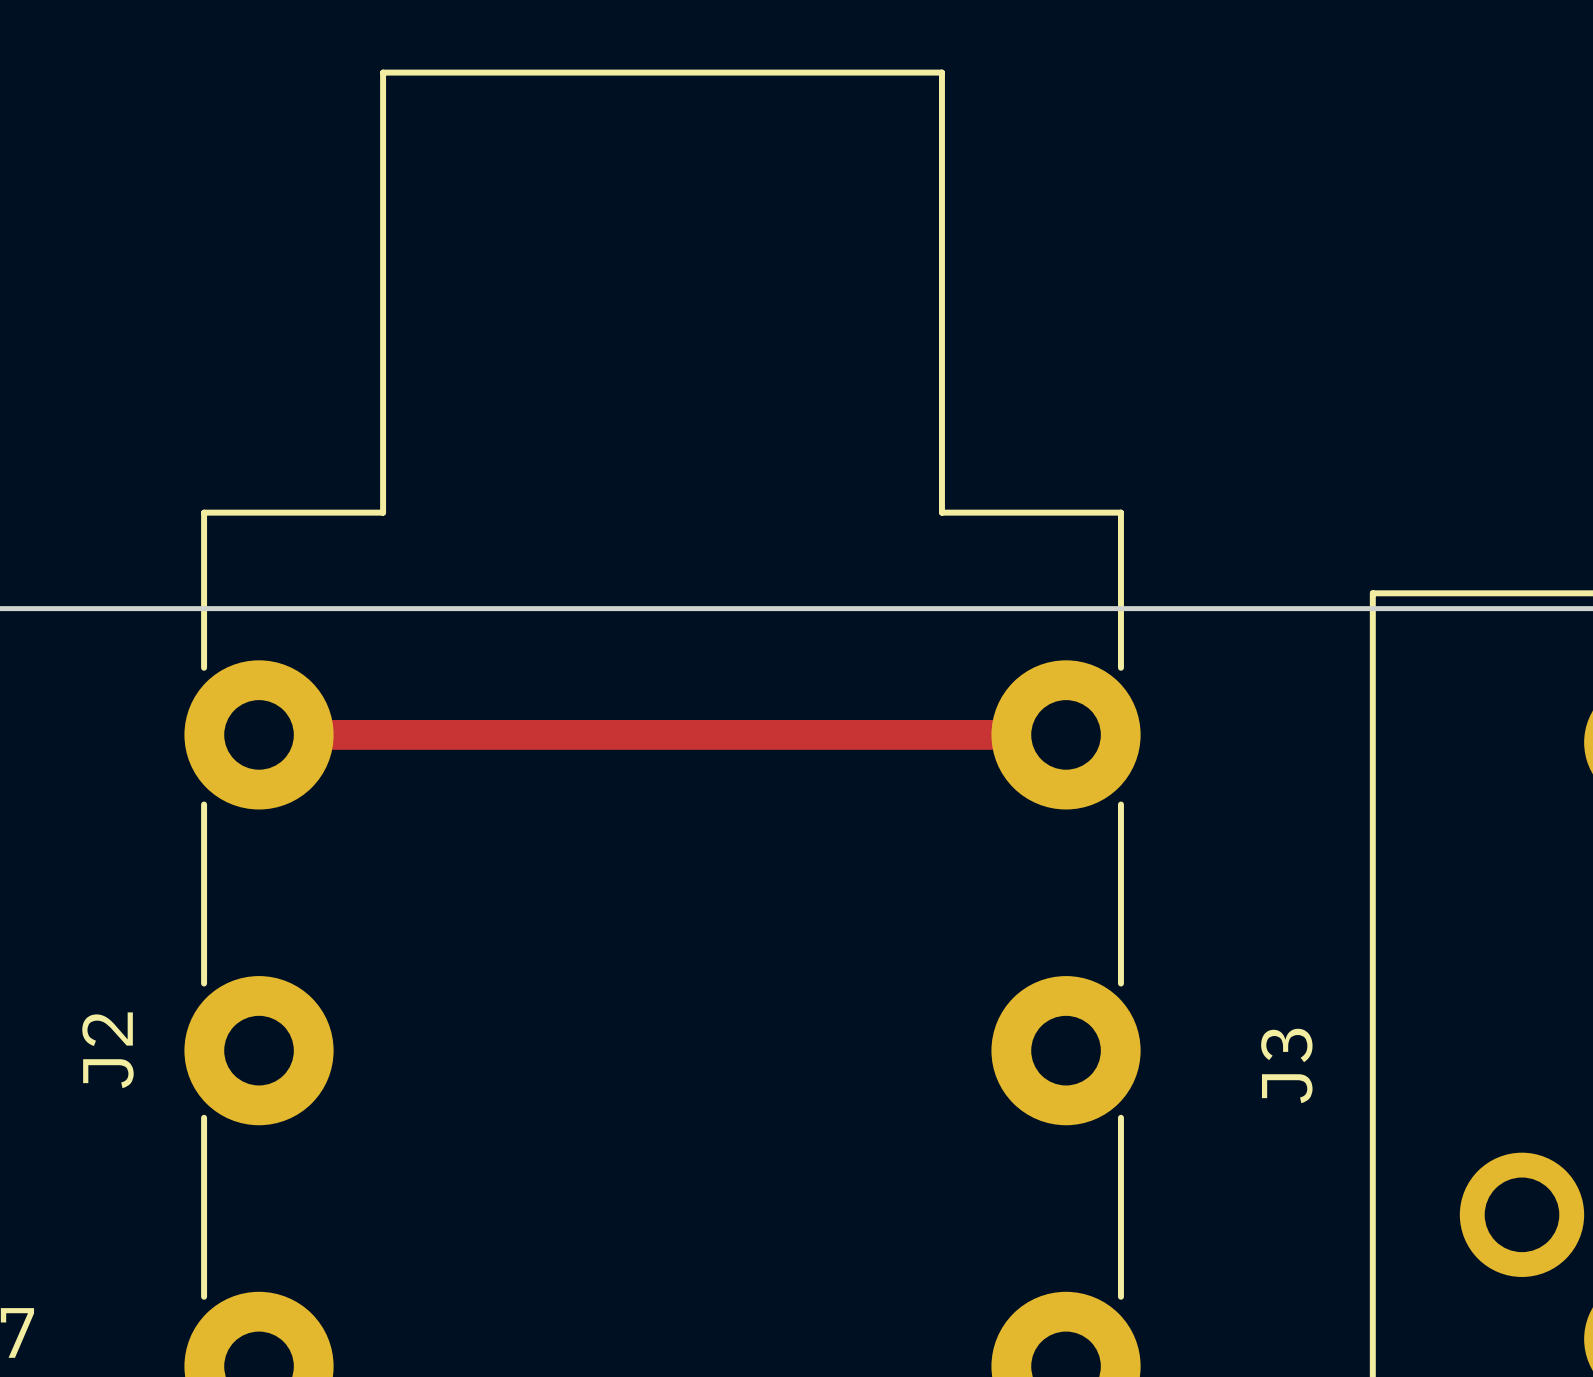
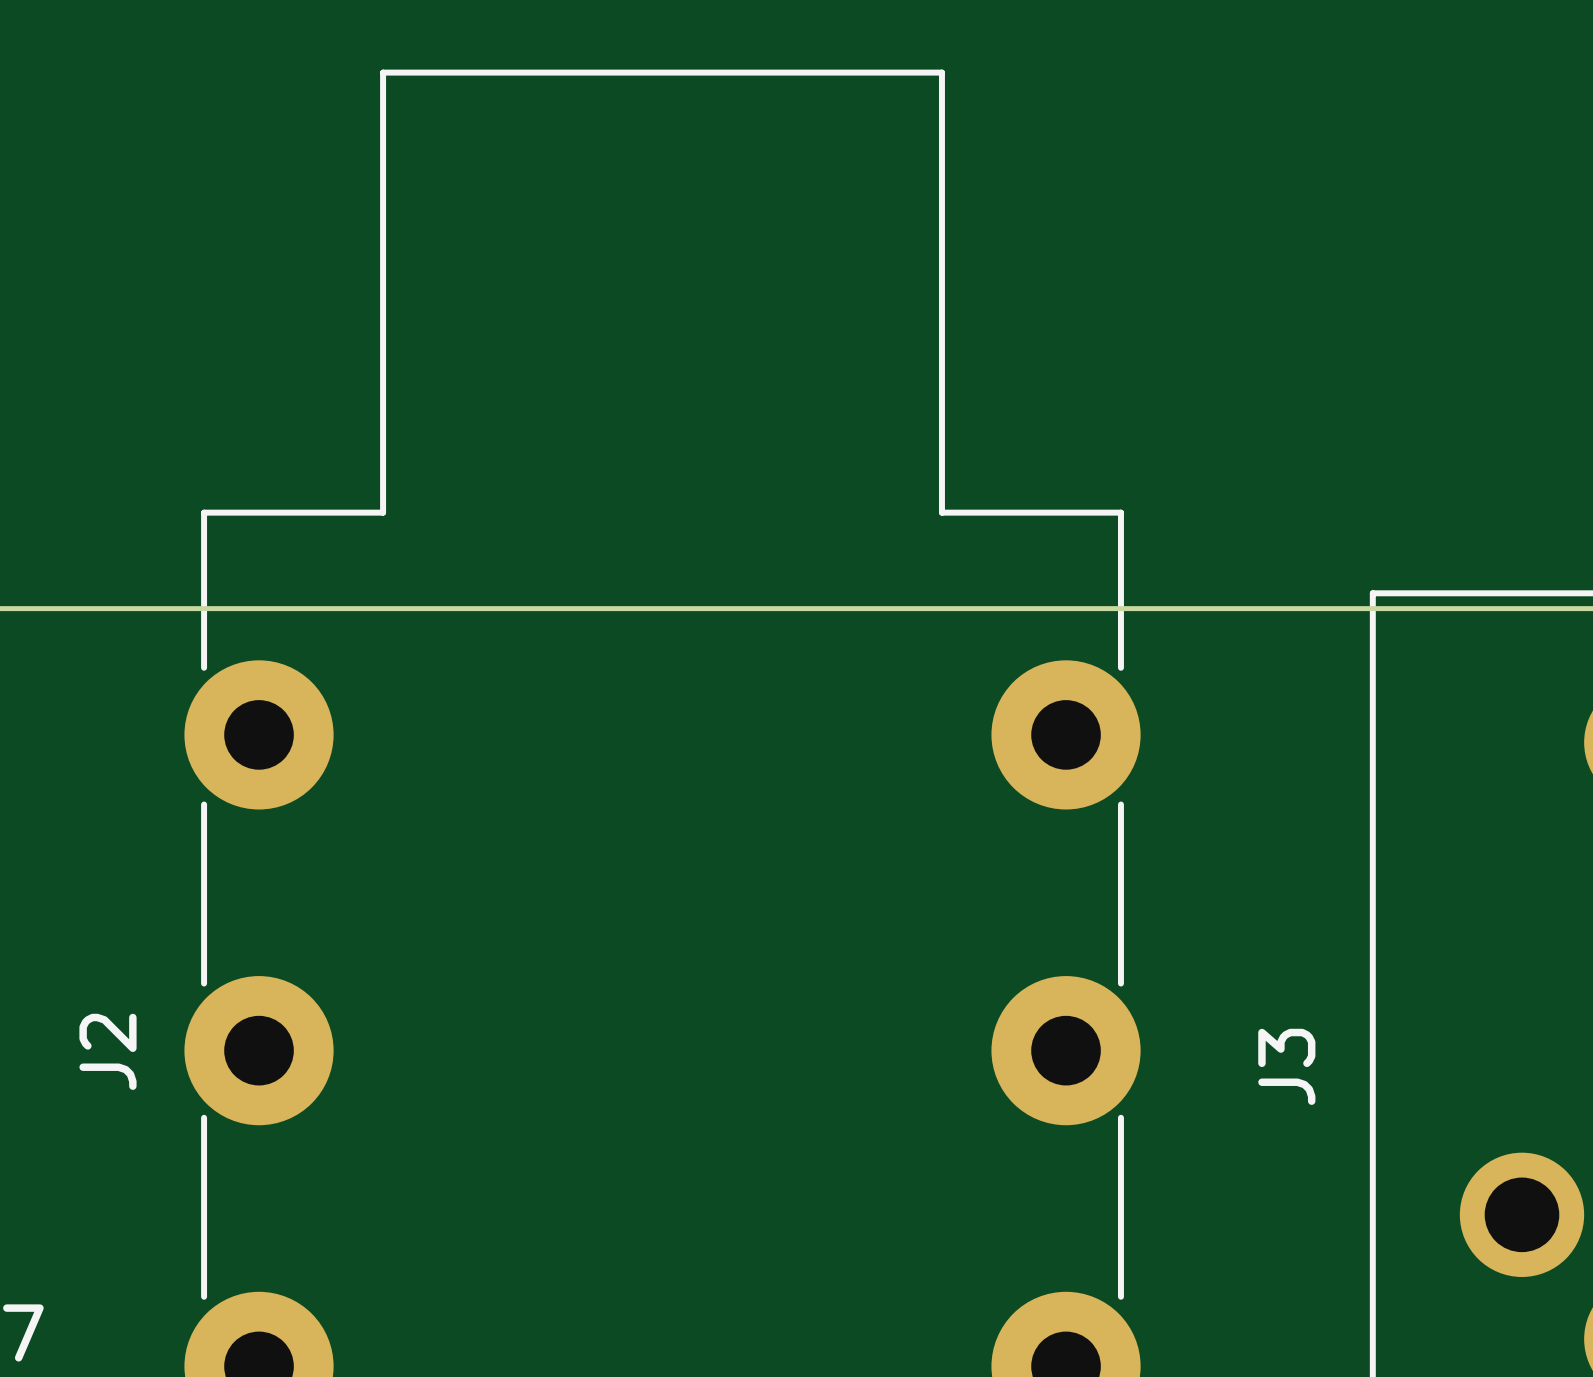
track: (259, 734) (1066, 734) -> none

